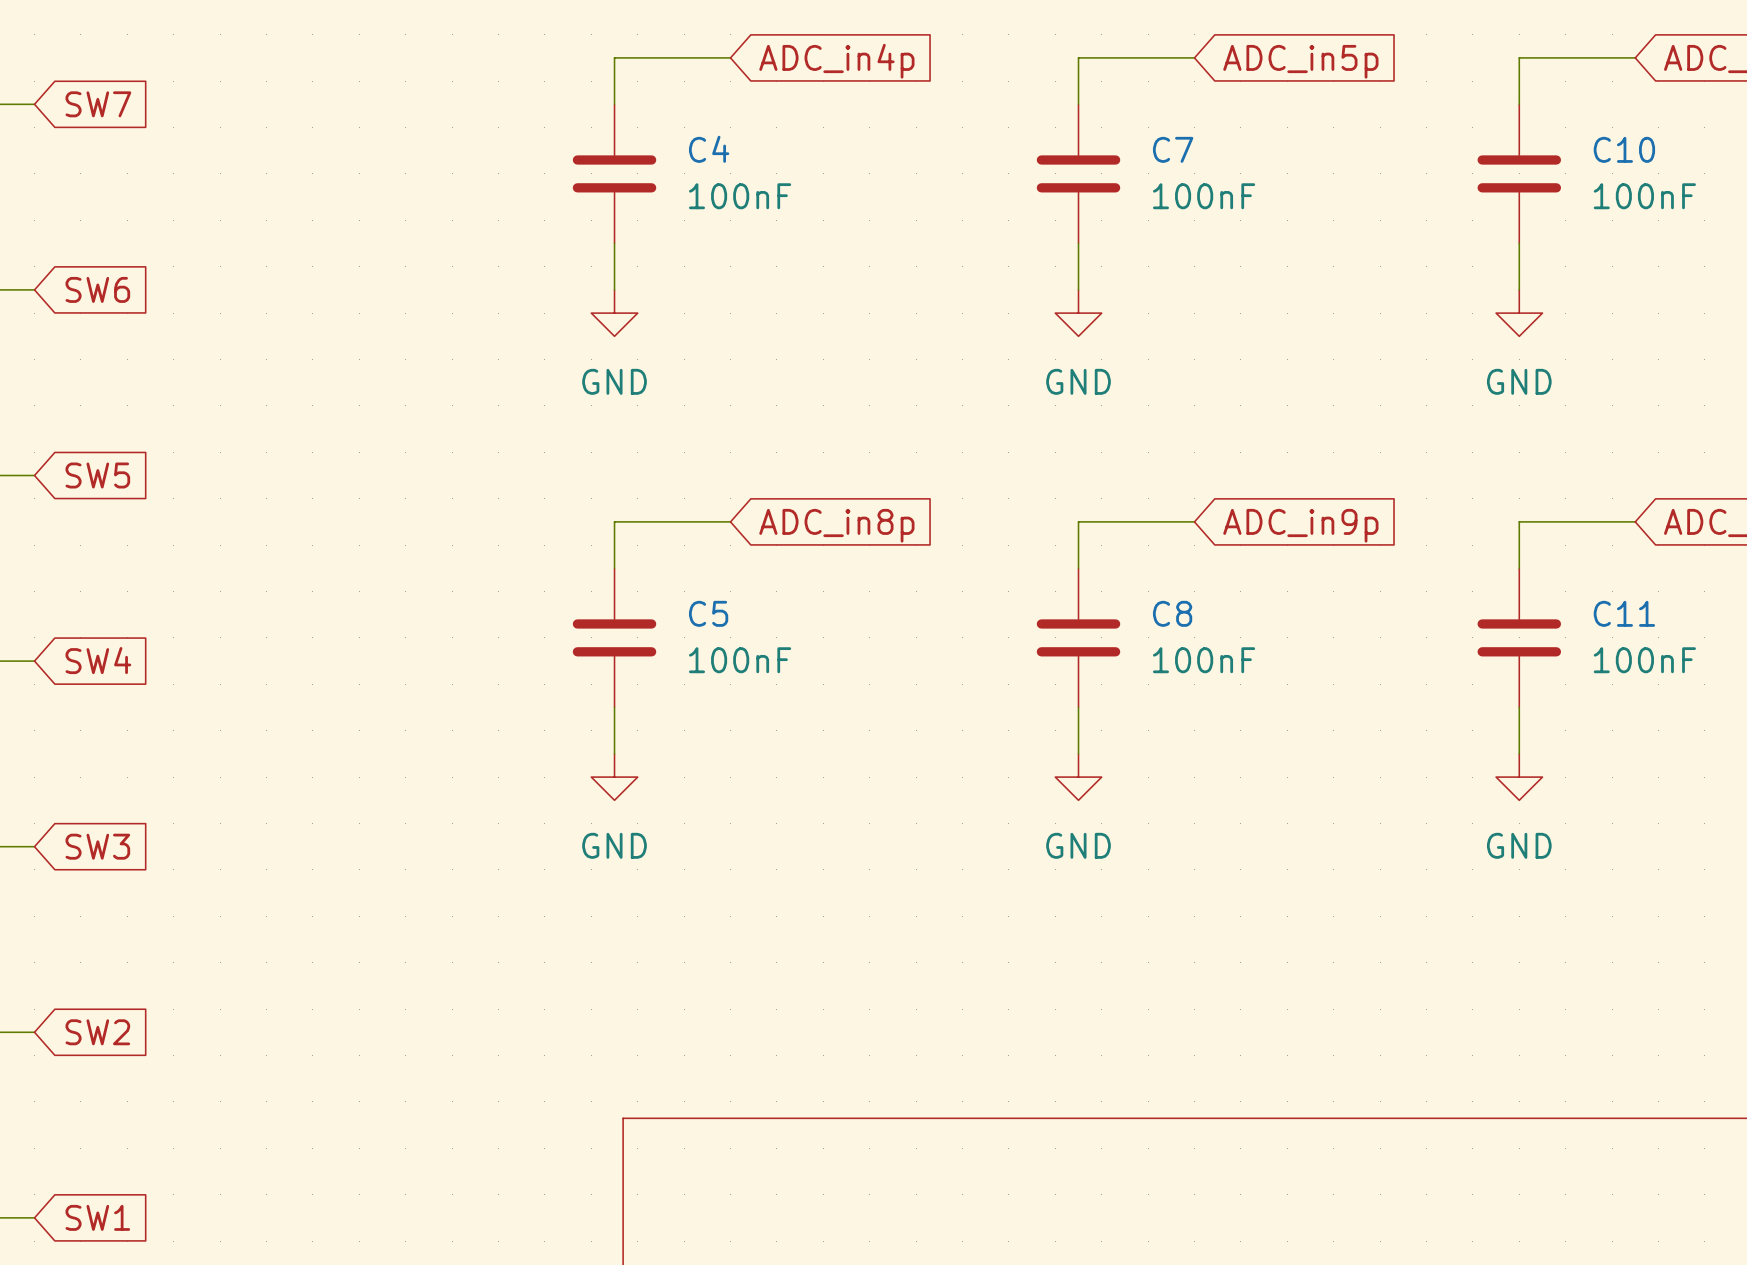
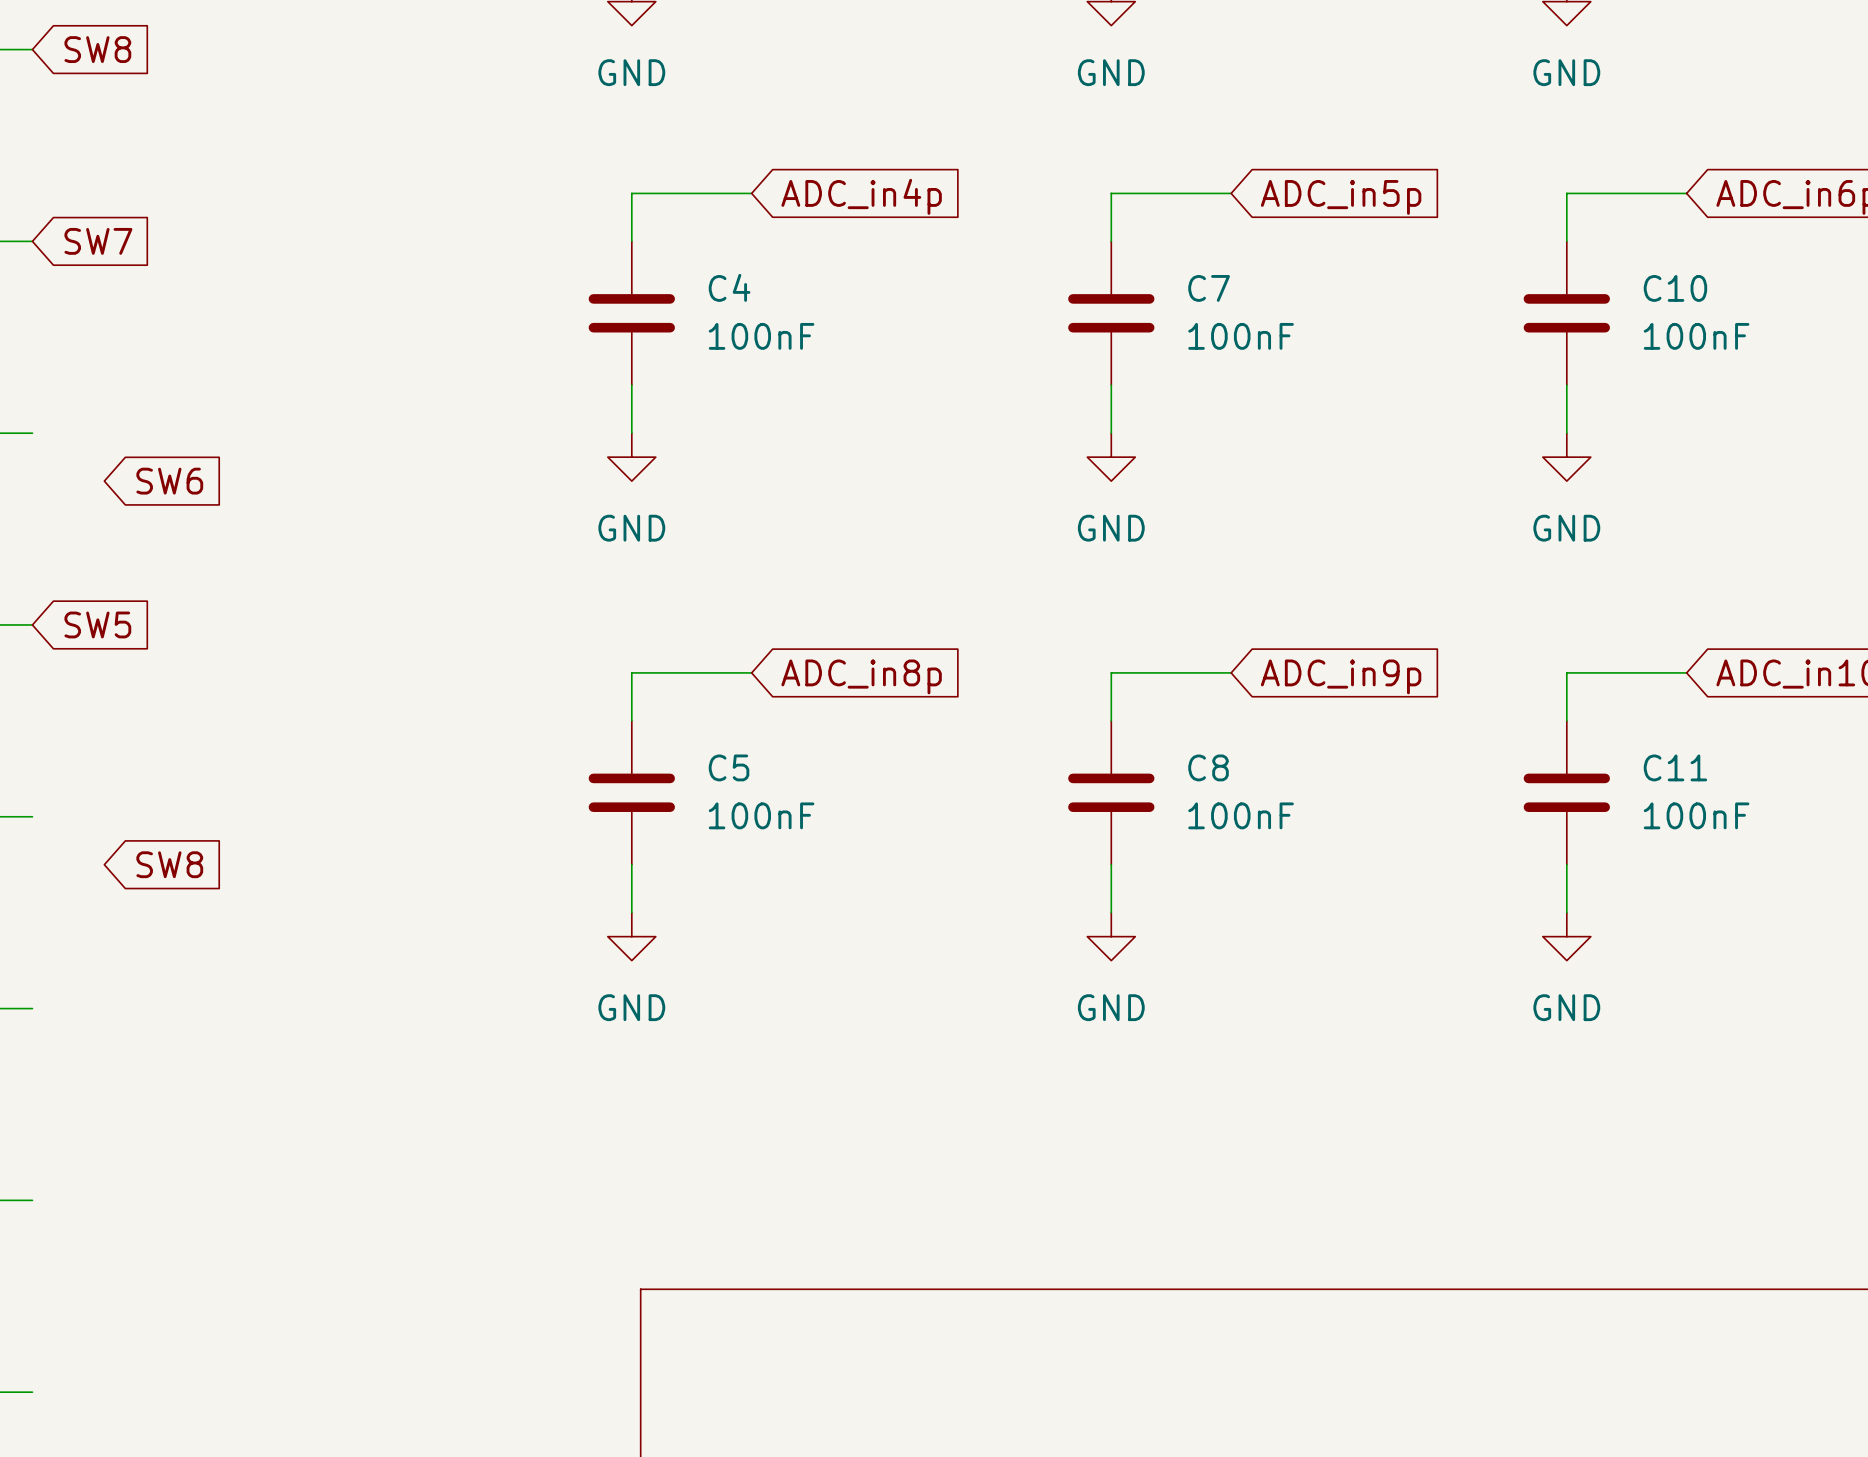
global label position: SW6 (97, 289) -> SW6 (169, 481)
global label: SW4 (98, 660) -> SW8 (169, 864)
global label: SW3 (97, 846) -> none
global label: SW2 (97, 1032) -> none
global label: SW1 (97, 1217) -> none

